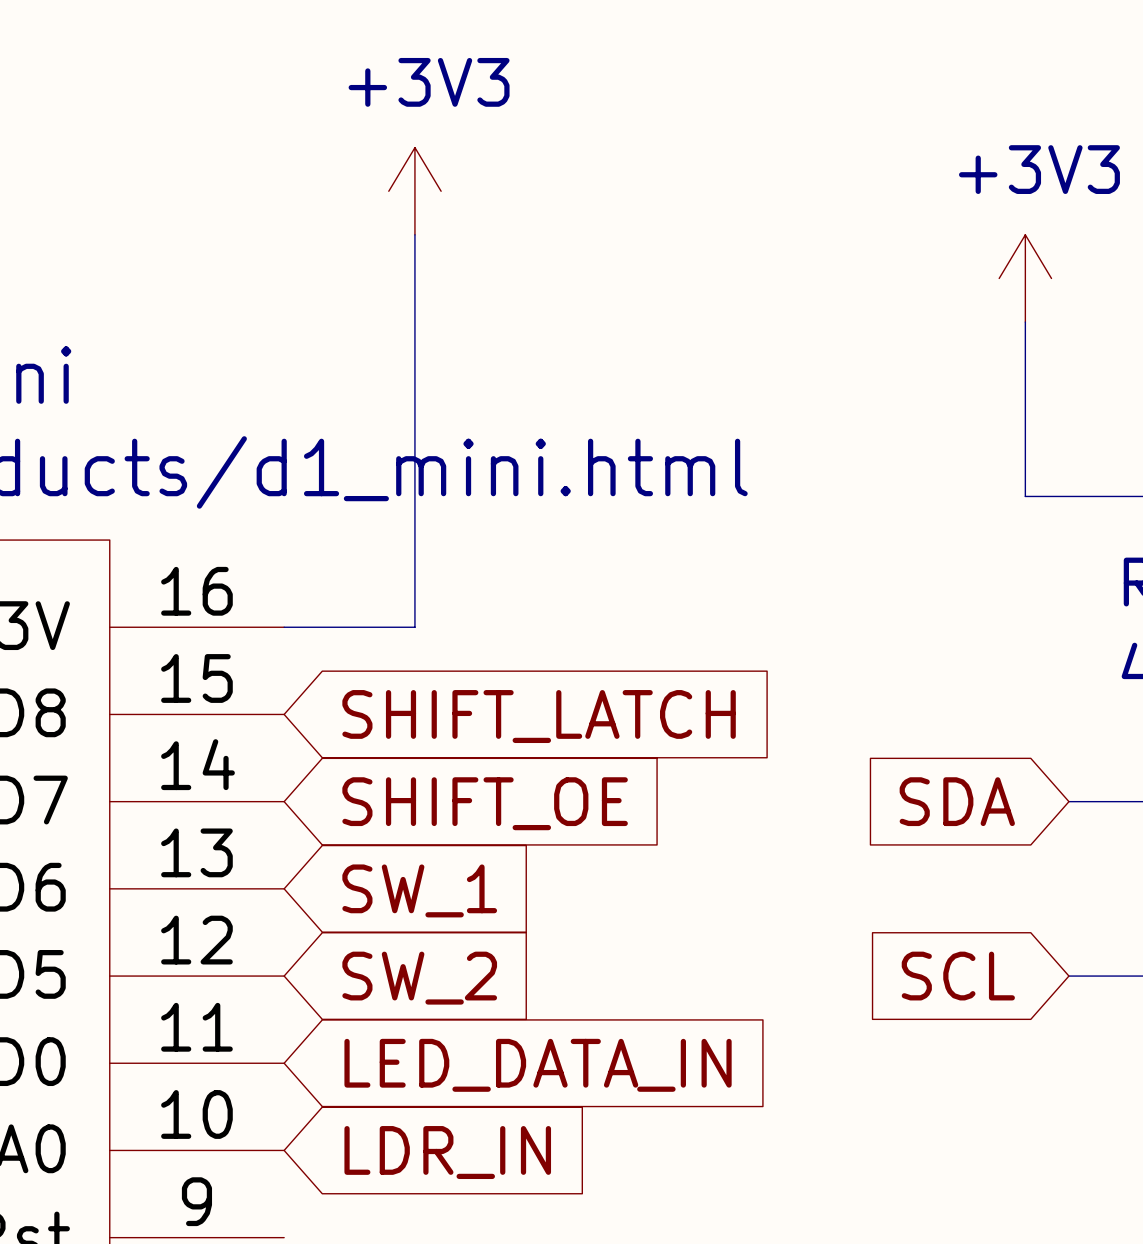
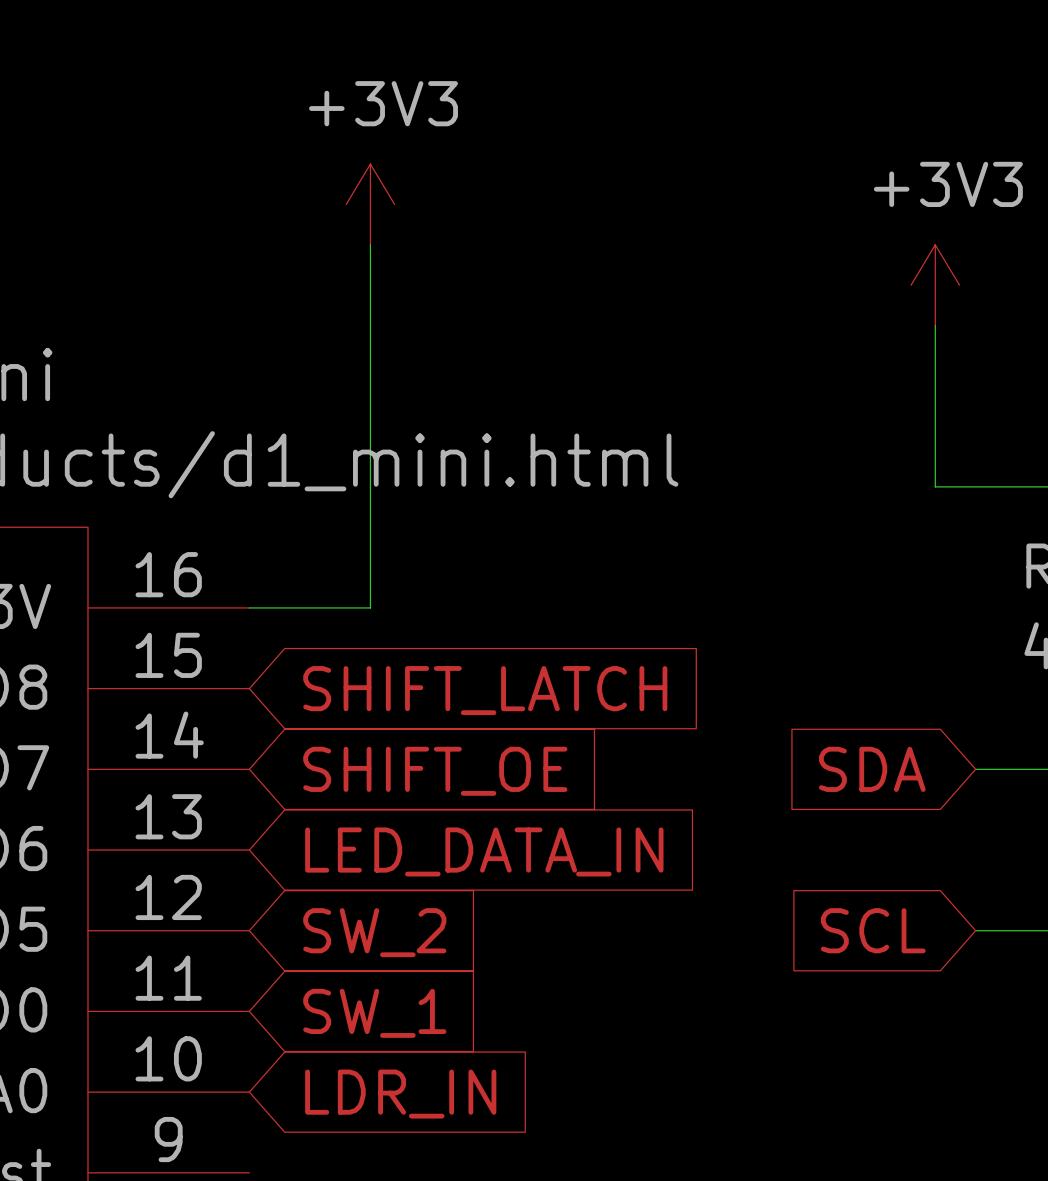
global label: SW_1 (419, 890) -> LED_DATA_IN (484, 851)
global label: LED_DATA_IN (538, 1065) -> SW_1 (374, 1013)

